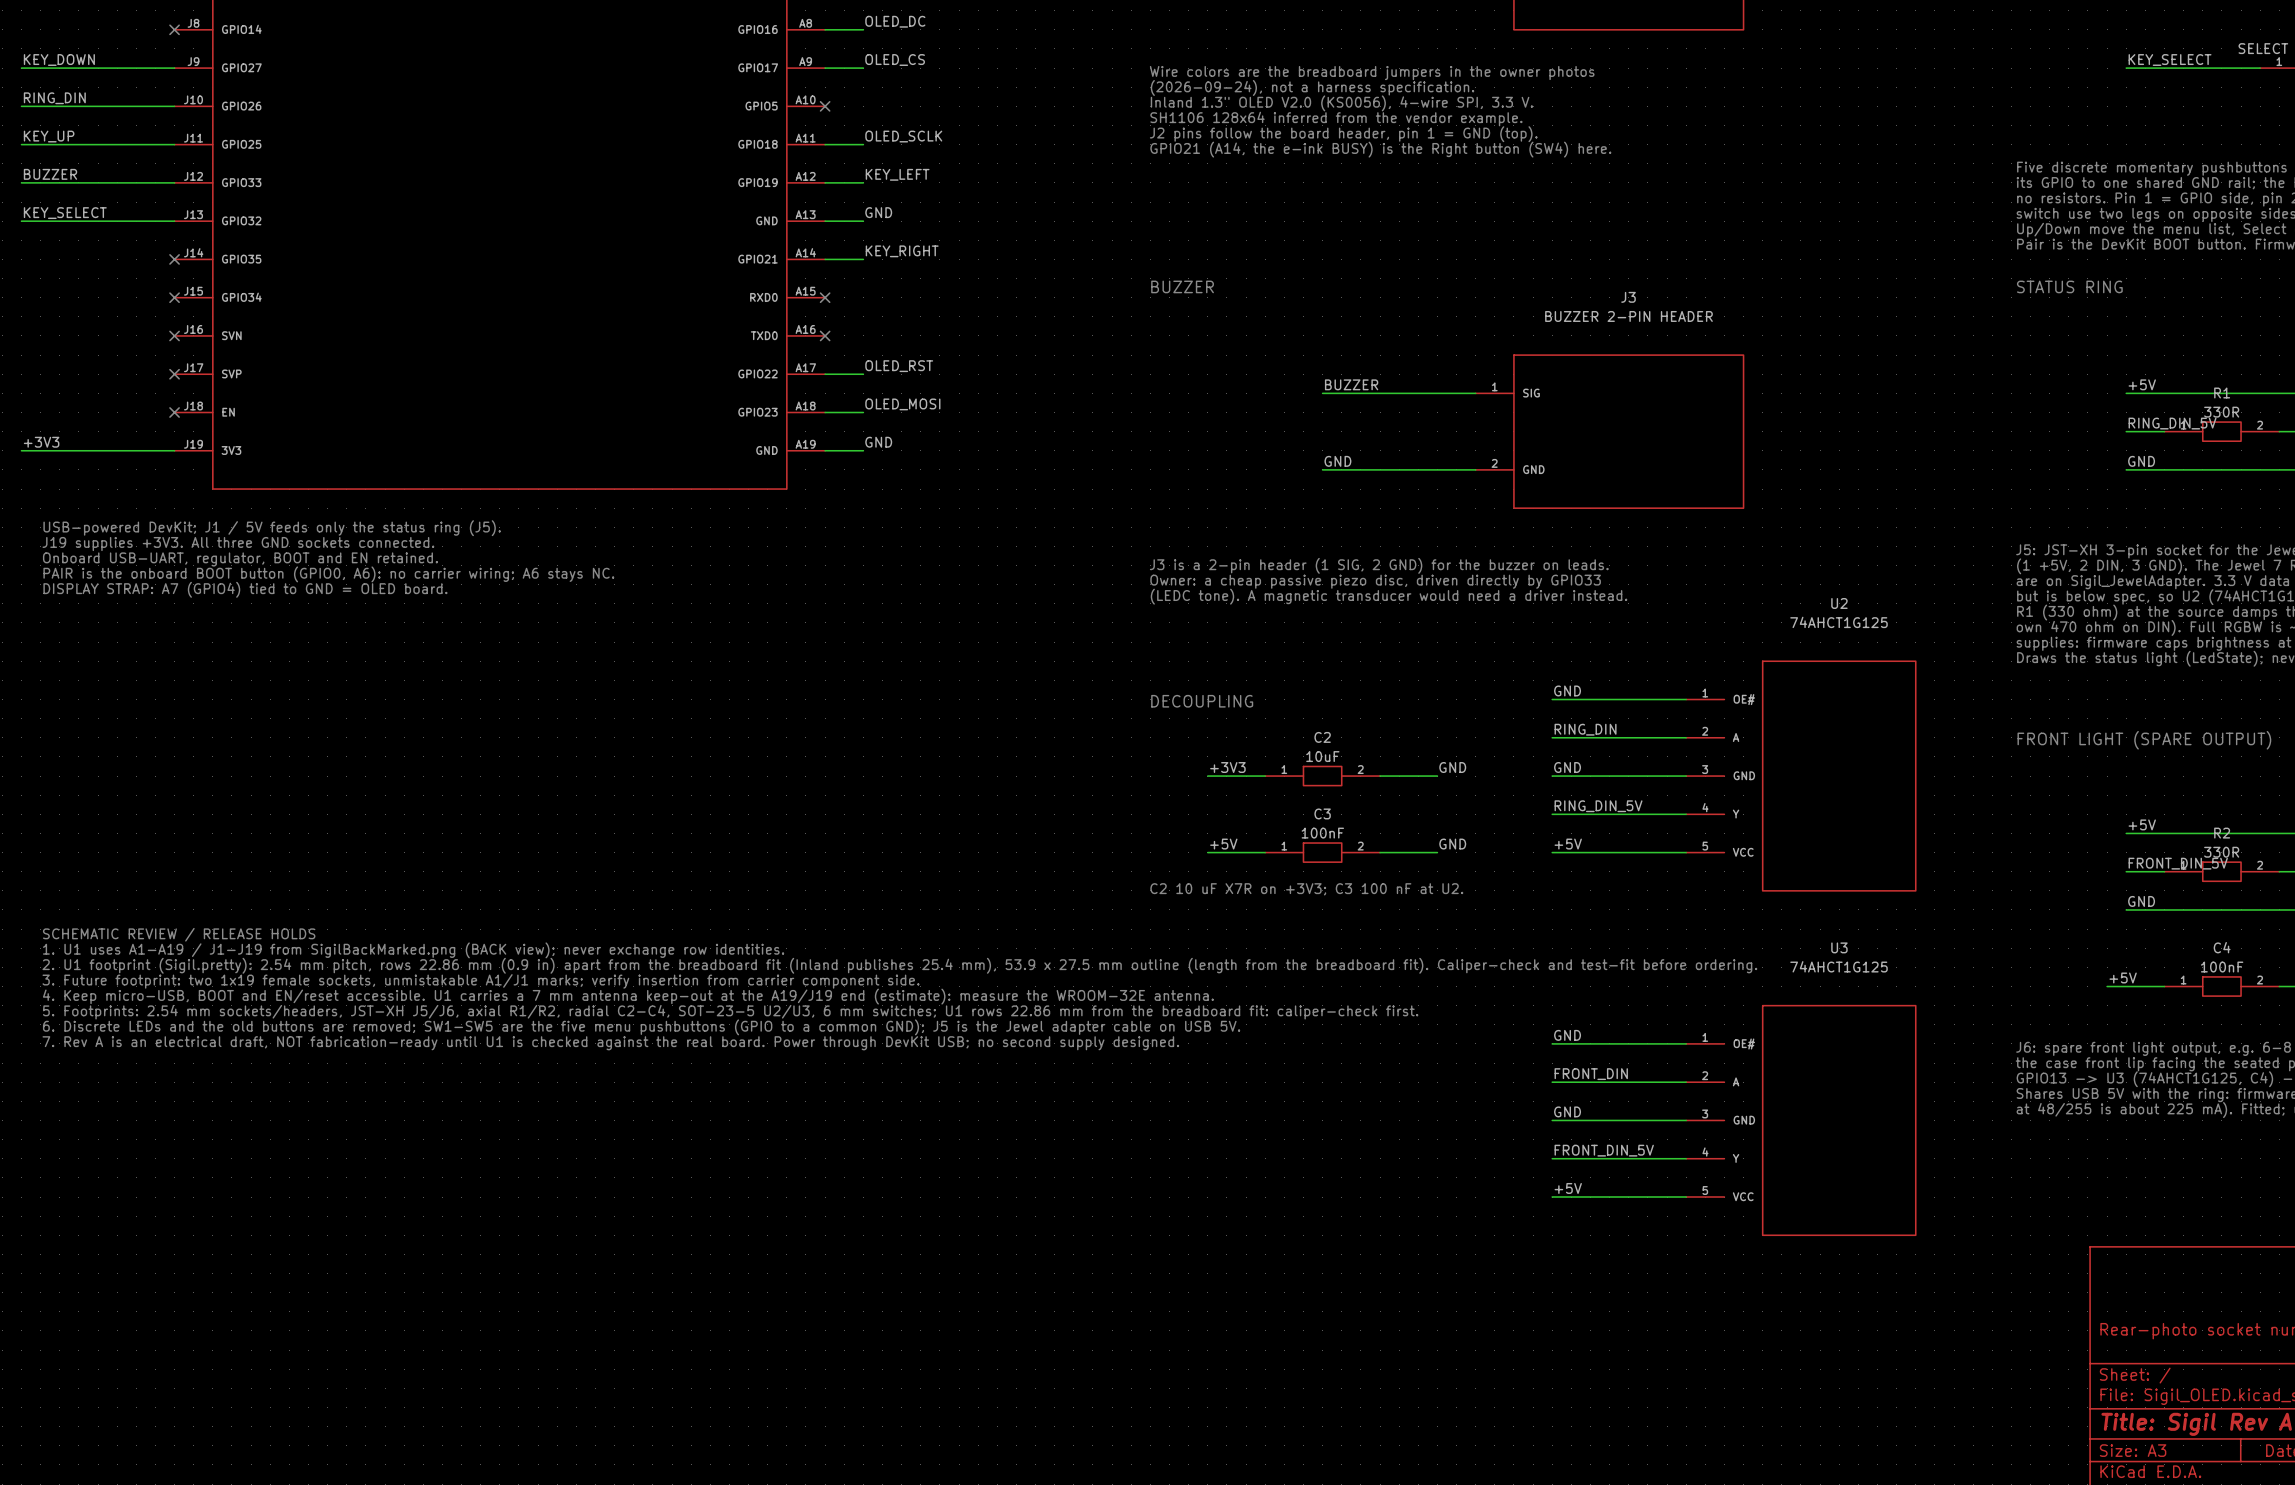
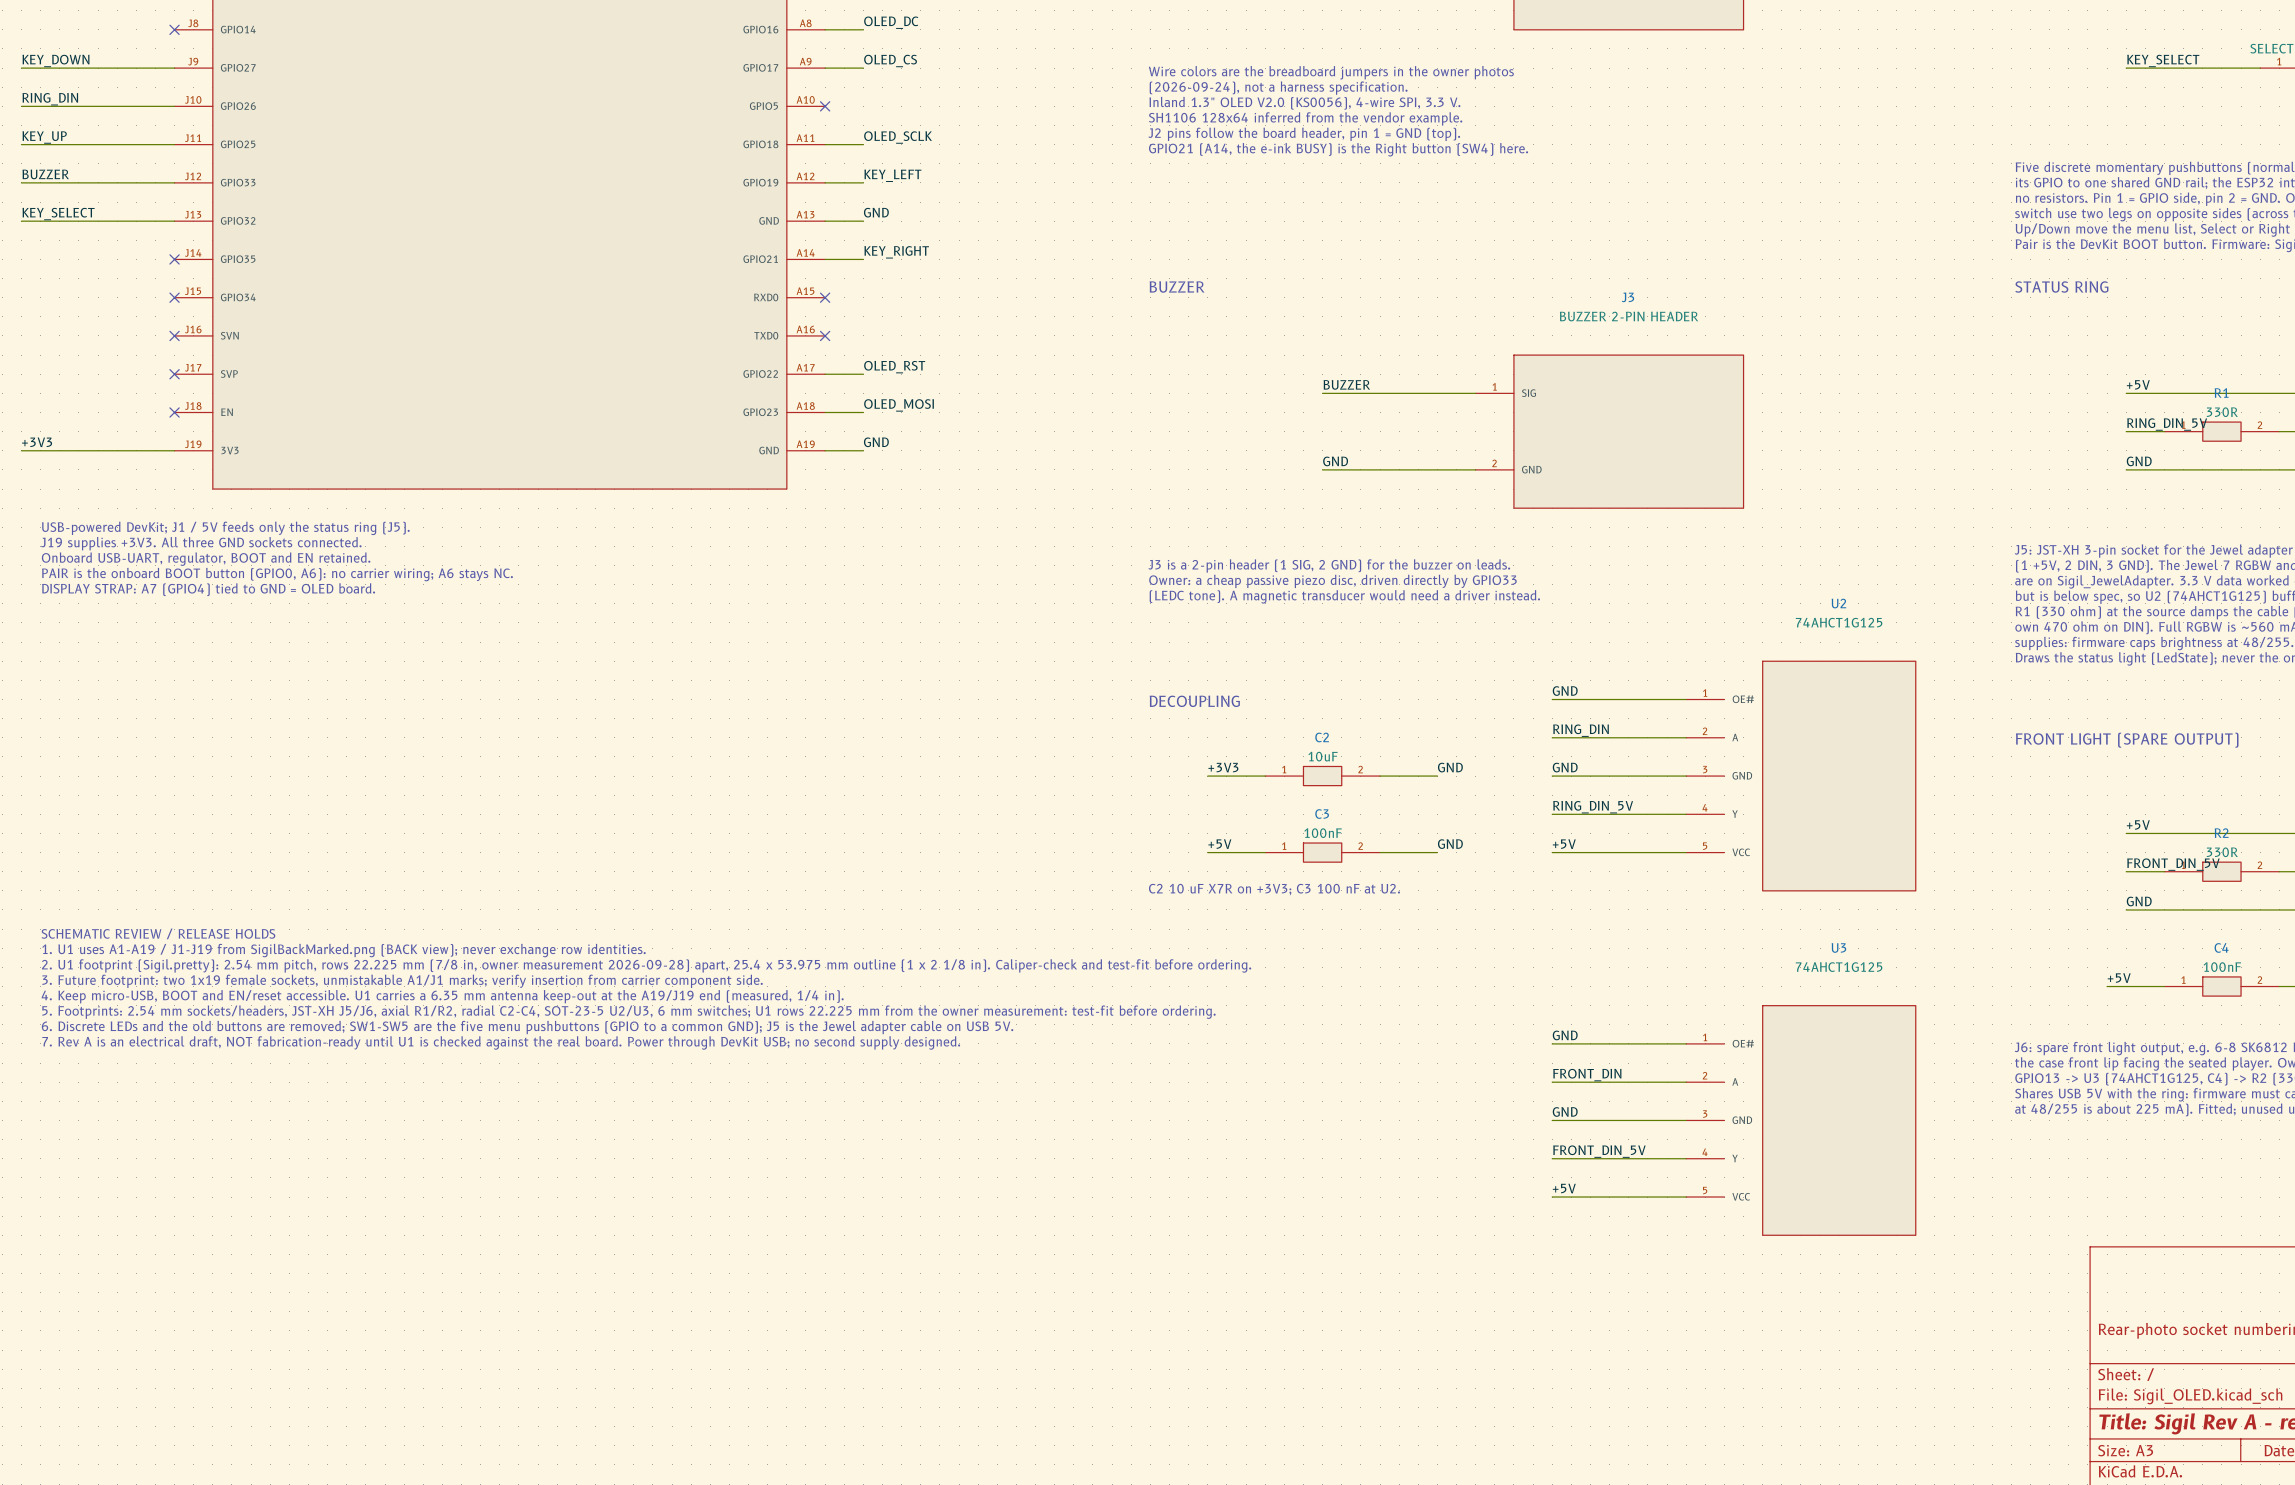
text: 2. U1 footprint (Sigil.pretty): 2.54 mm pitch, rows 22.86 mm (0.9 in) apart from the breadboard fit (Inland publishes 25.4 mm), 53.9 x 27.5 mm outline (length from the breadboard fit). Caliper-check and test-fit before ordering. (899, 965) -> 2. U1 footprint (Sigil.pretty): 2.54 mm pitch, rows 22.225 mm (7/8 in, owner measurement 2026-09-28) apart, 25.4 x 53.975 mm outline (1 x 2 1/8 in). Caliper-check and test-fit before ordering. (646, 965)
text: 4. Keep micro-USB, BOOT and EN/reset accessible. U1 carries a 7 mm antenna keep-out at the A19/J19 end (estimate): measure the WROOM-32E antenna. (628, 996) -> 4. Keep micro-USB, BOOT and EN/reset accessible. U1 carries a 6.35 mm antenna keep-out at the A19/J19 end (measured, 1/4 in). (442, 996)
text: 5. Footprints: 2.54 mm sockets/headers, JST-XH J5/J6, axial R1/R2, radial C2-C4, SOT-23-5 U2/U3, 6 mm switches; U1 rows 22.86 mm from the breadboard fit: caliper-check first. (730, 1012) -> 5. Footprints: 2.54 mm sockets/headers, JST-XH J5/J6, axial R1/R2, radial C2-C4, SOT-23-5 U2/U3, 6 mm switches; U1 rows 22.225 mm from the owner measurement: test-fit before ordering. (628, 1012)

